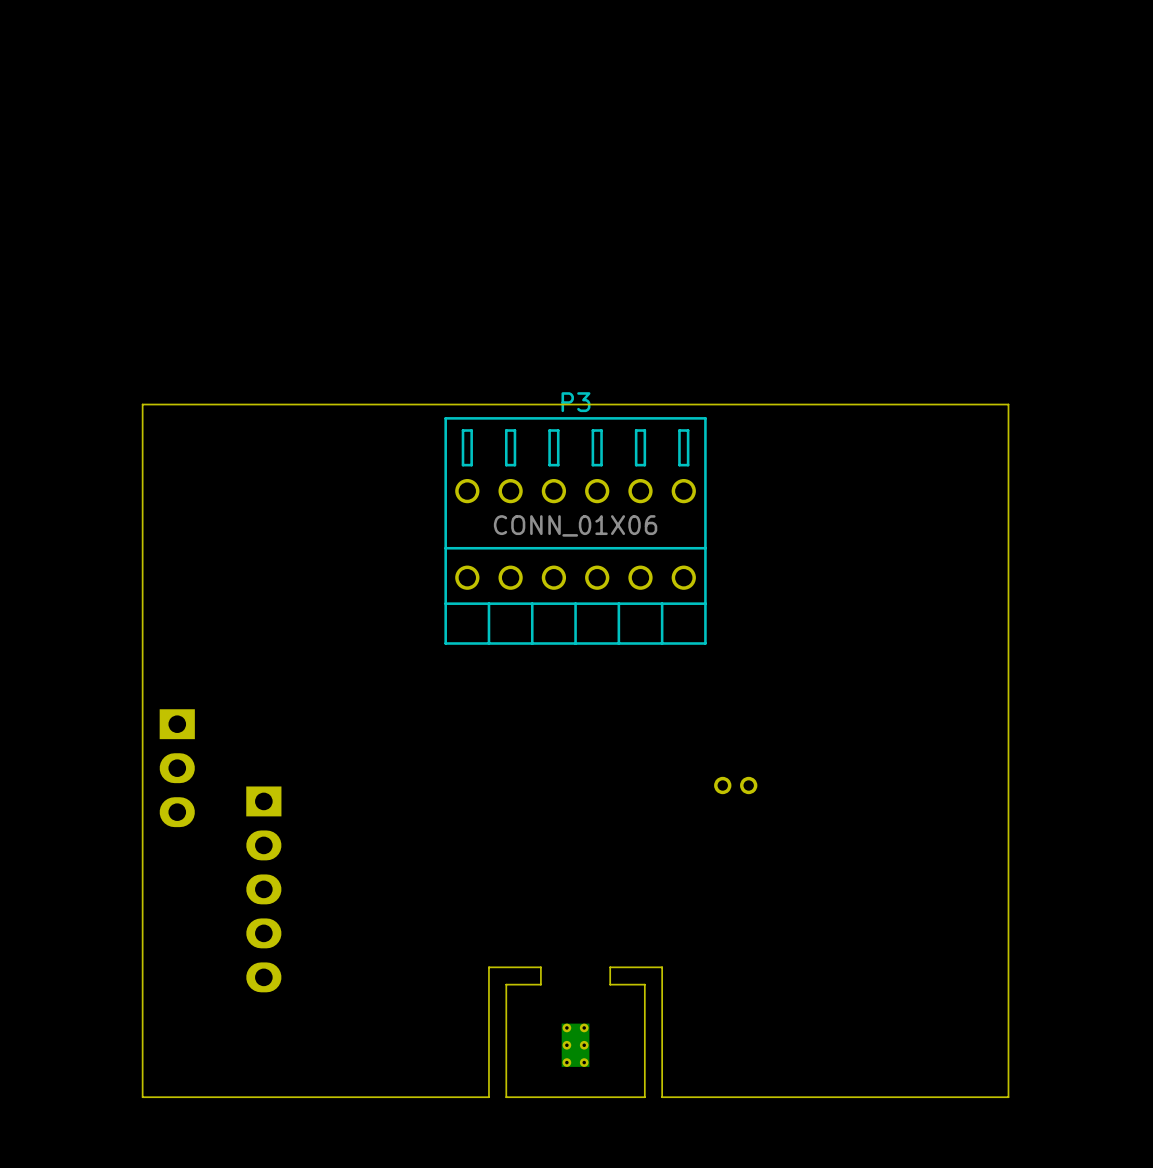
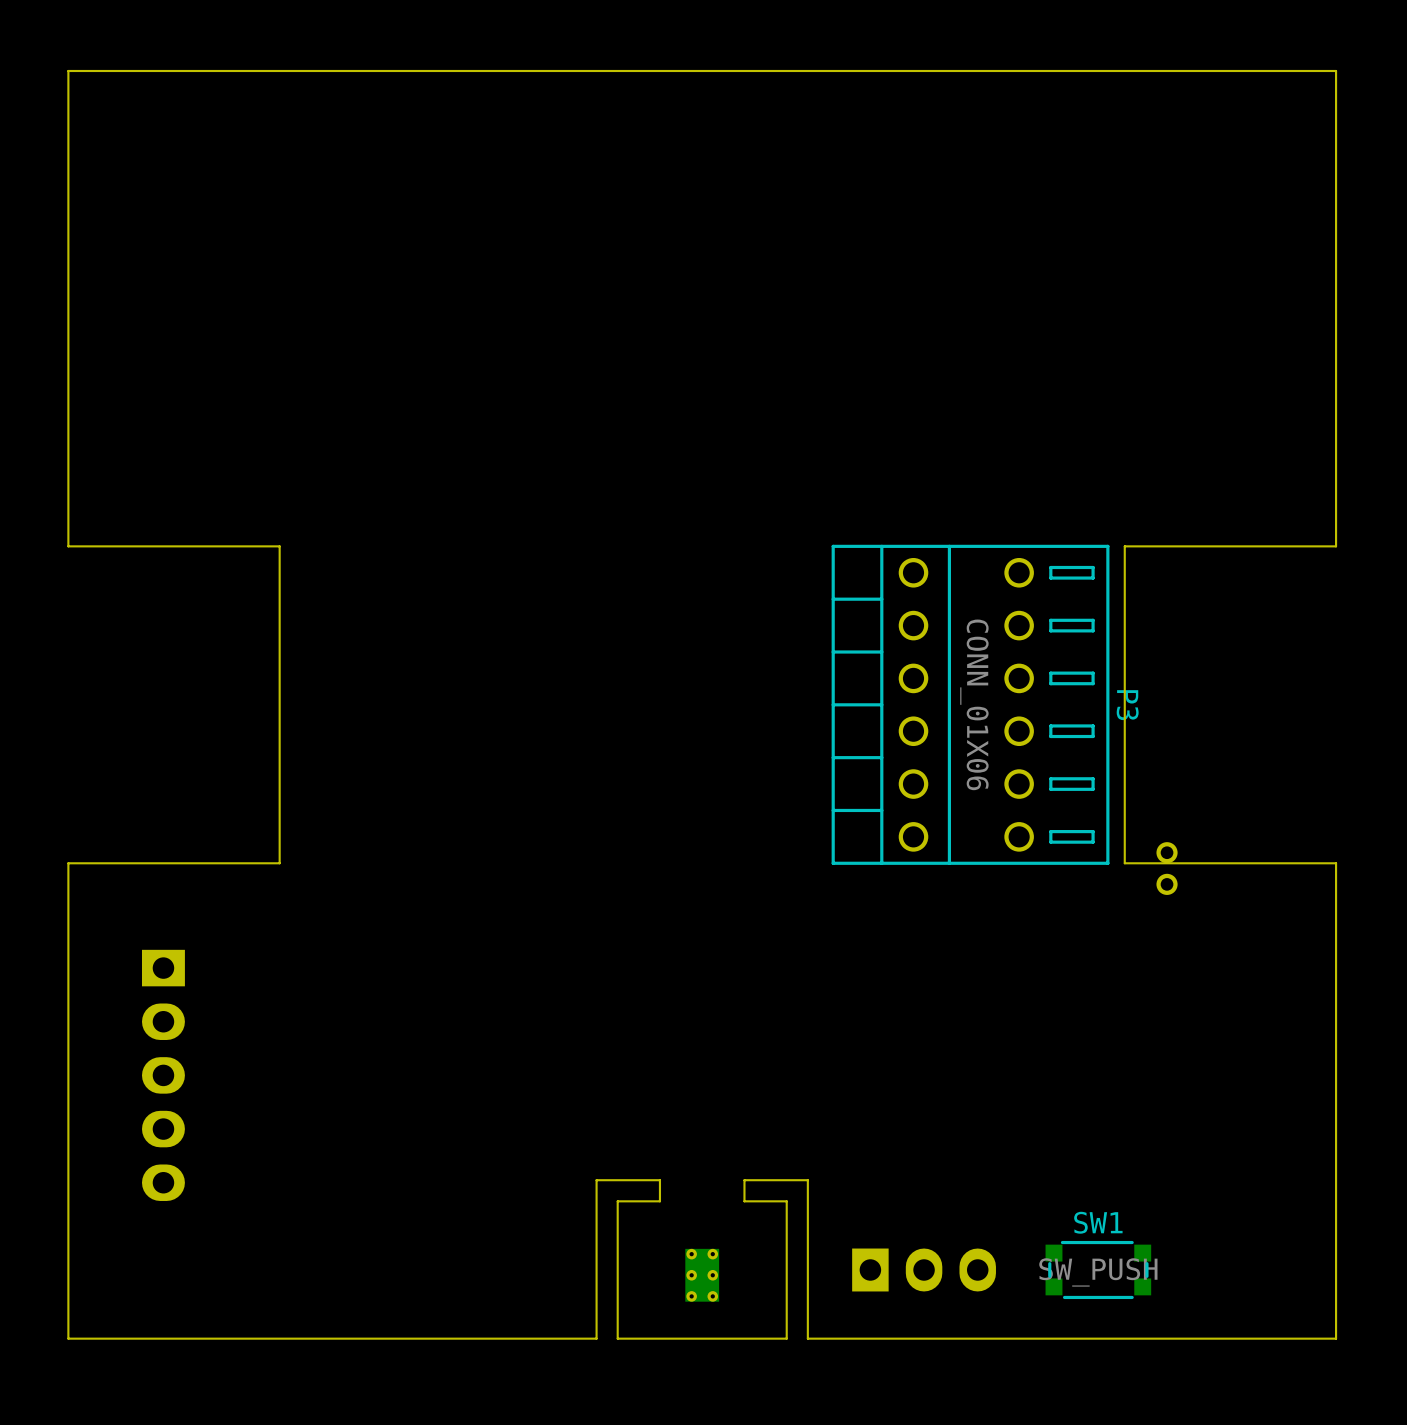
P3 rotation: 0° (575, 530) -> 90° clockwise (970, 704)
P3 position: (575, 530) -> (970, 704)
part: (177, 768) -> none
part rotation: 0° (735, 785) -> 90° clockwise (1167, 868)
part position: (735, 785) -> (1167, 868)
part position: (263, 889) -> (163, 1075)
part: none -> (924, 1269)
SW1: none -> SW_PUSH (1098, 1269)
board edge: (1008, 1097) (1008, 404) (142, 404) (142, 1097) -> (1230, 1338) (1336, 1338) (1336, 863) (1124, 863) (1124, 546) (1336, 546) (1336, 70) (68, 70) (68, 546) (279, 546) (279, 863) (68, 863) (68, 1338) (174, 1338)

